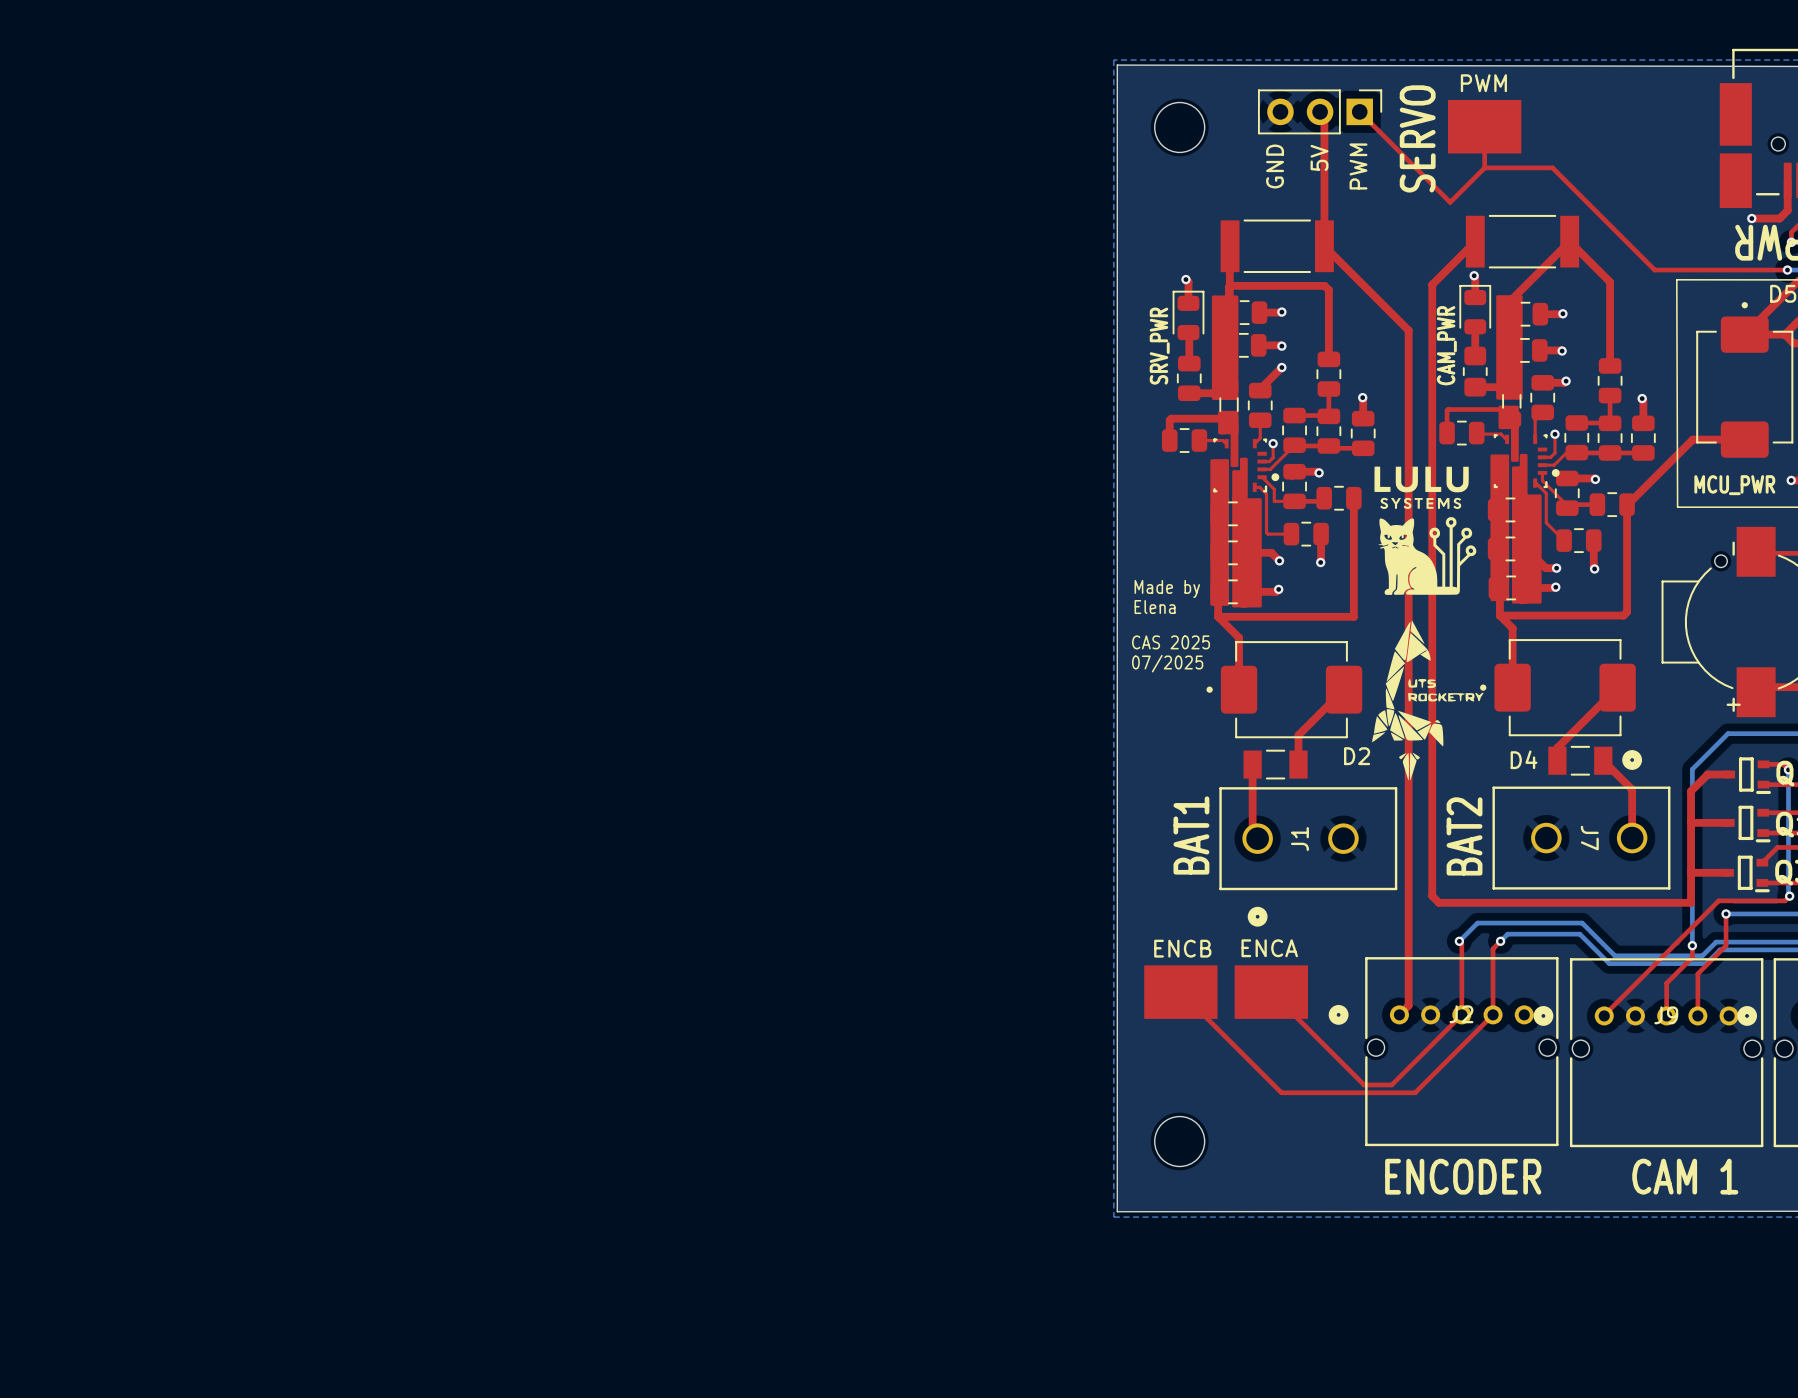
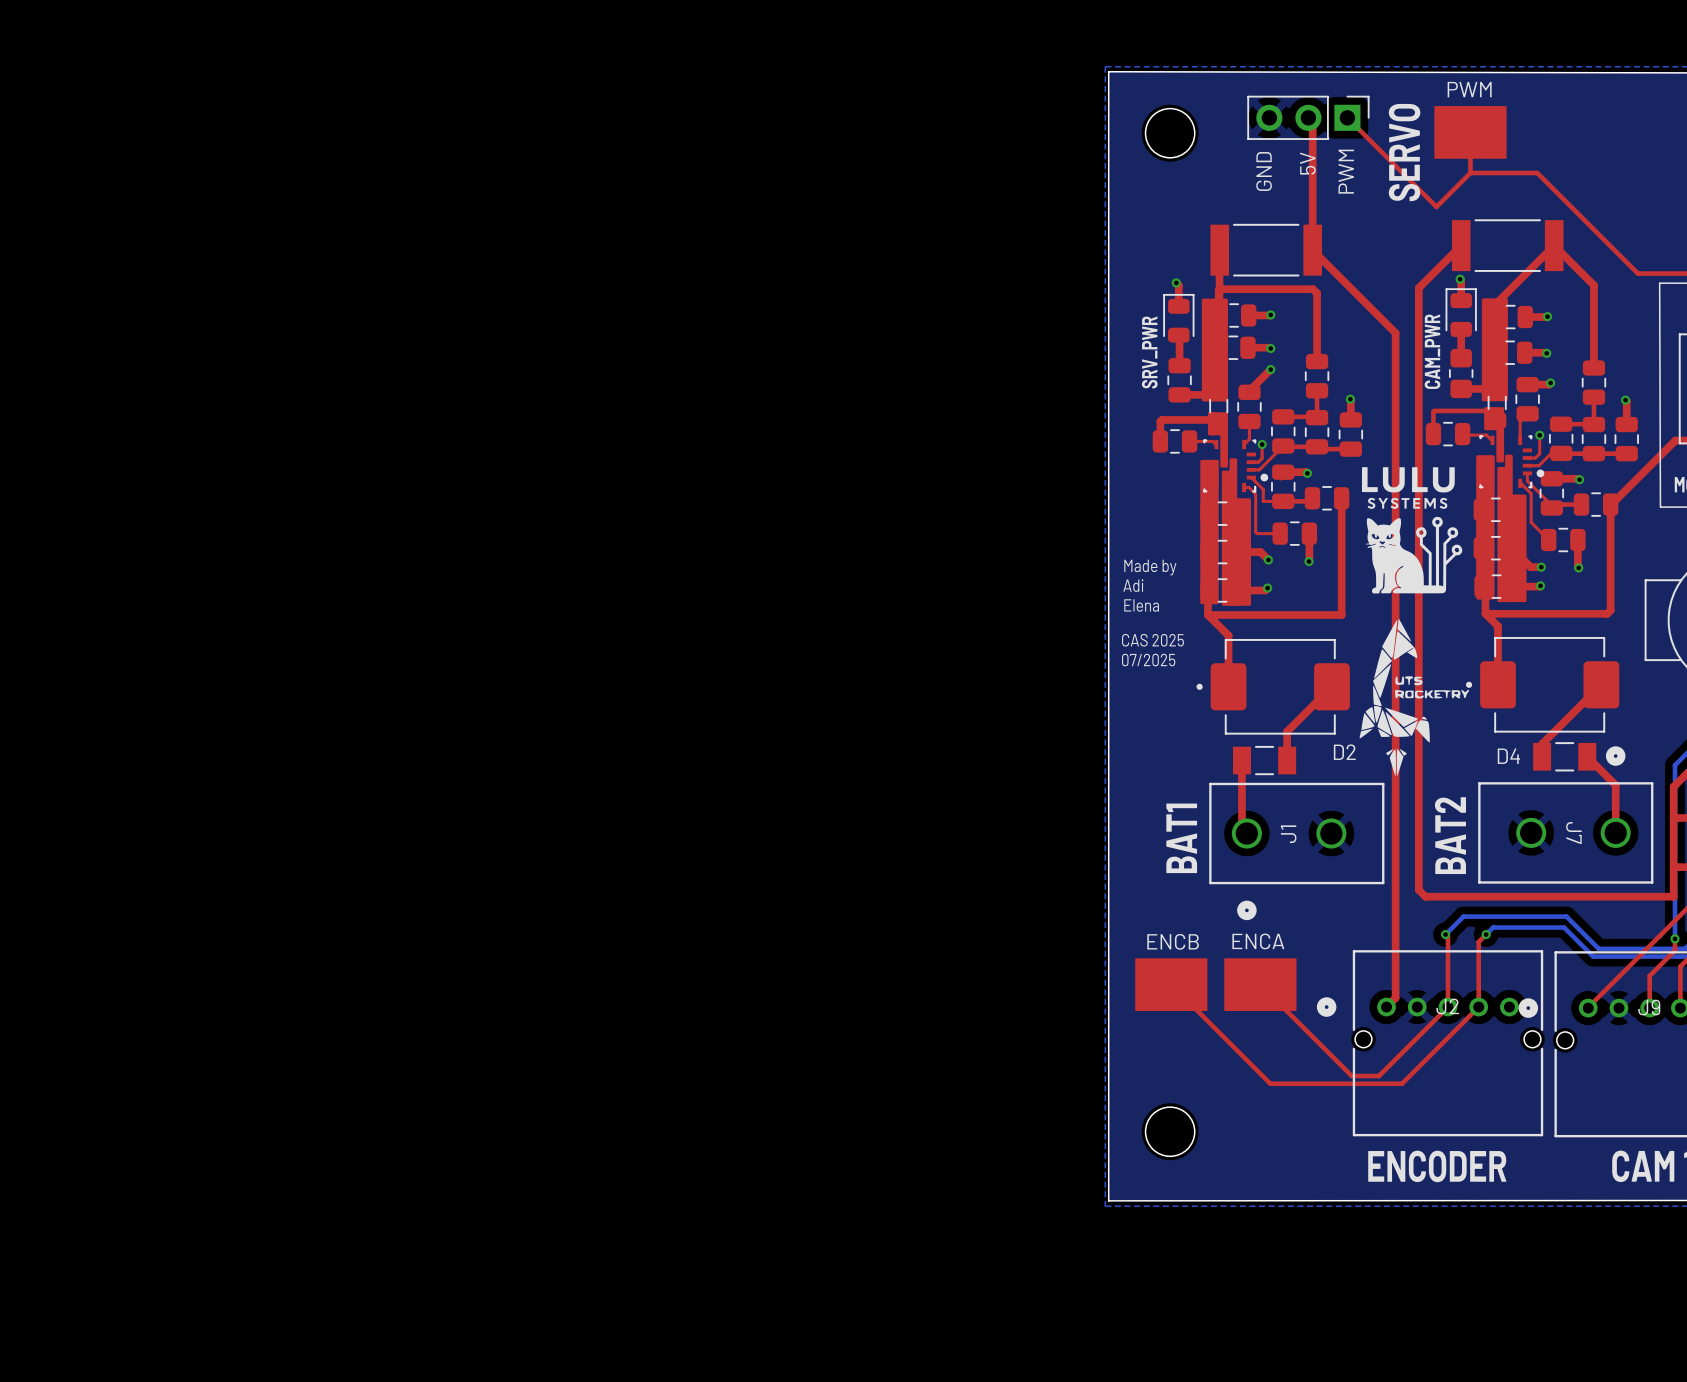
text: none -> Made by (1150, 567)
text: Made by (1167, 589) -> Adi (1133, 585)

